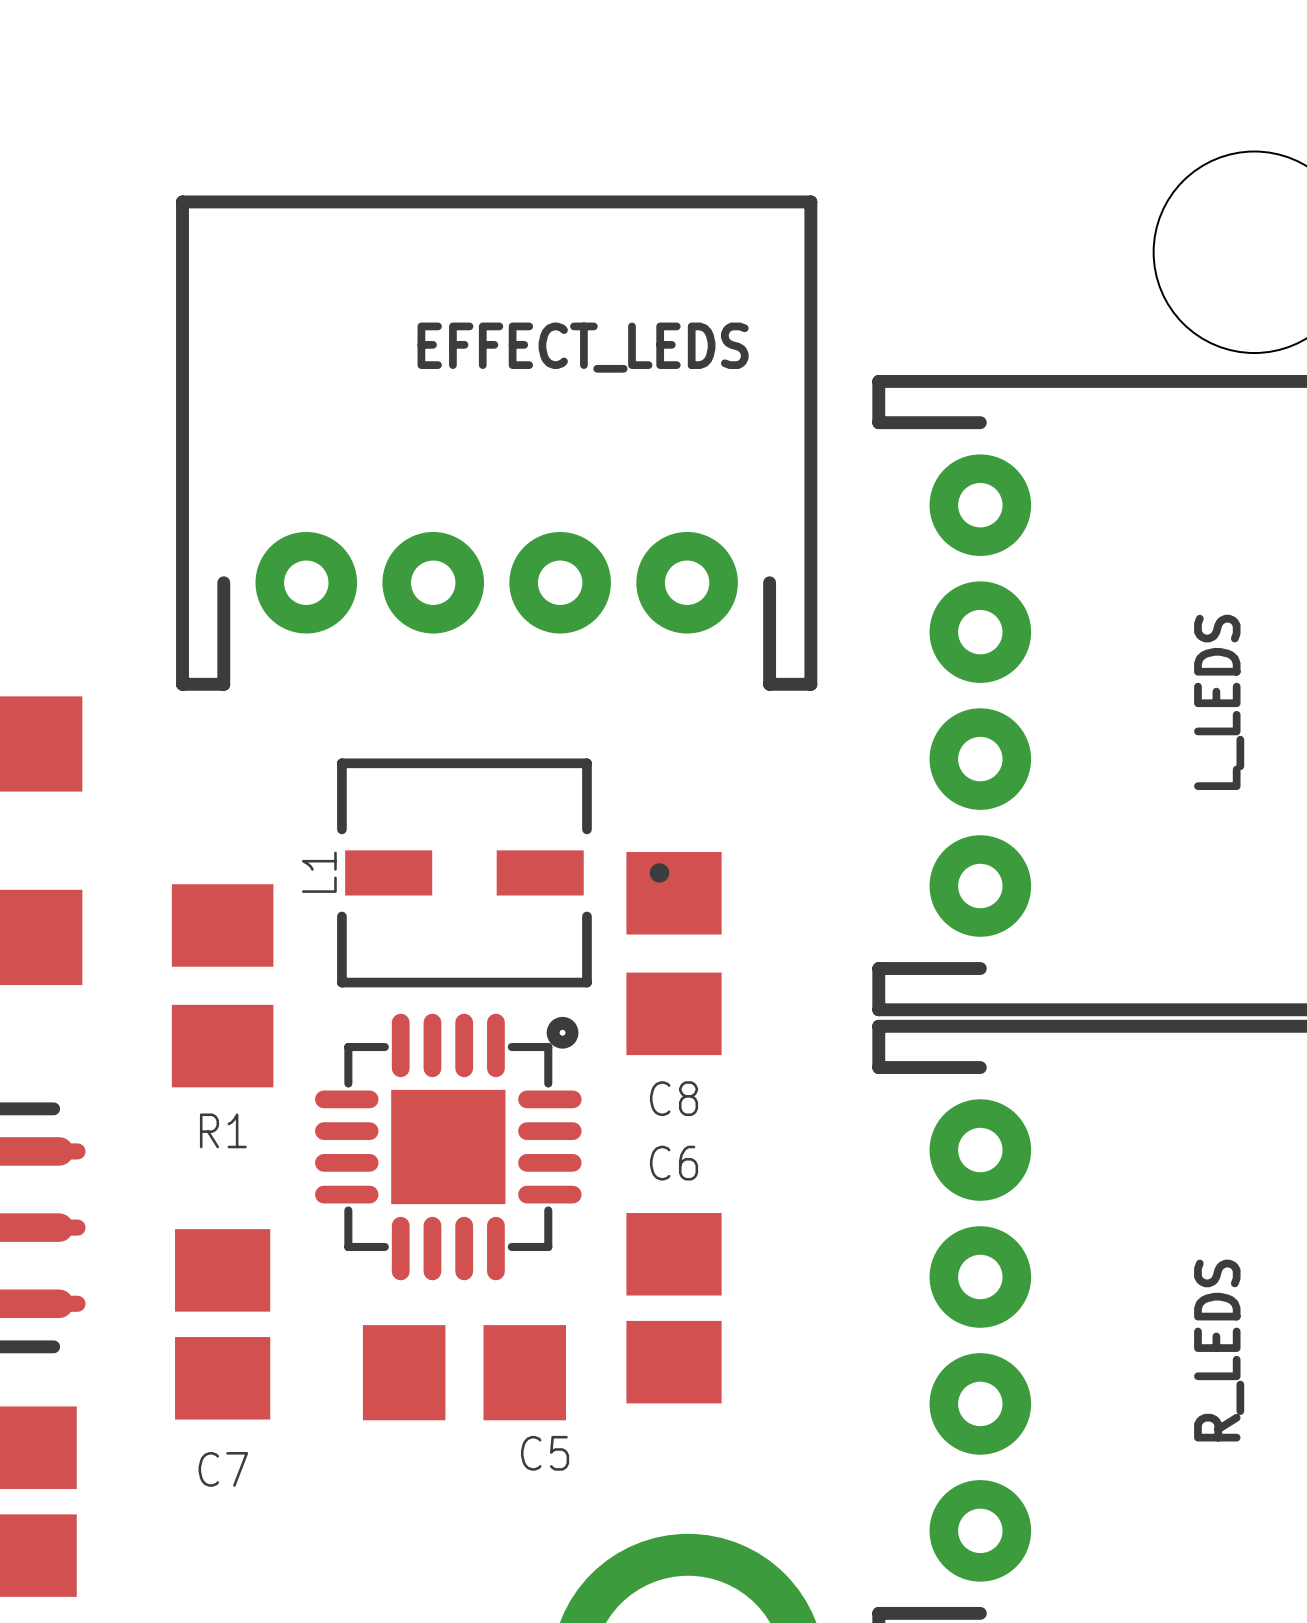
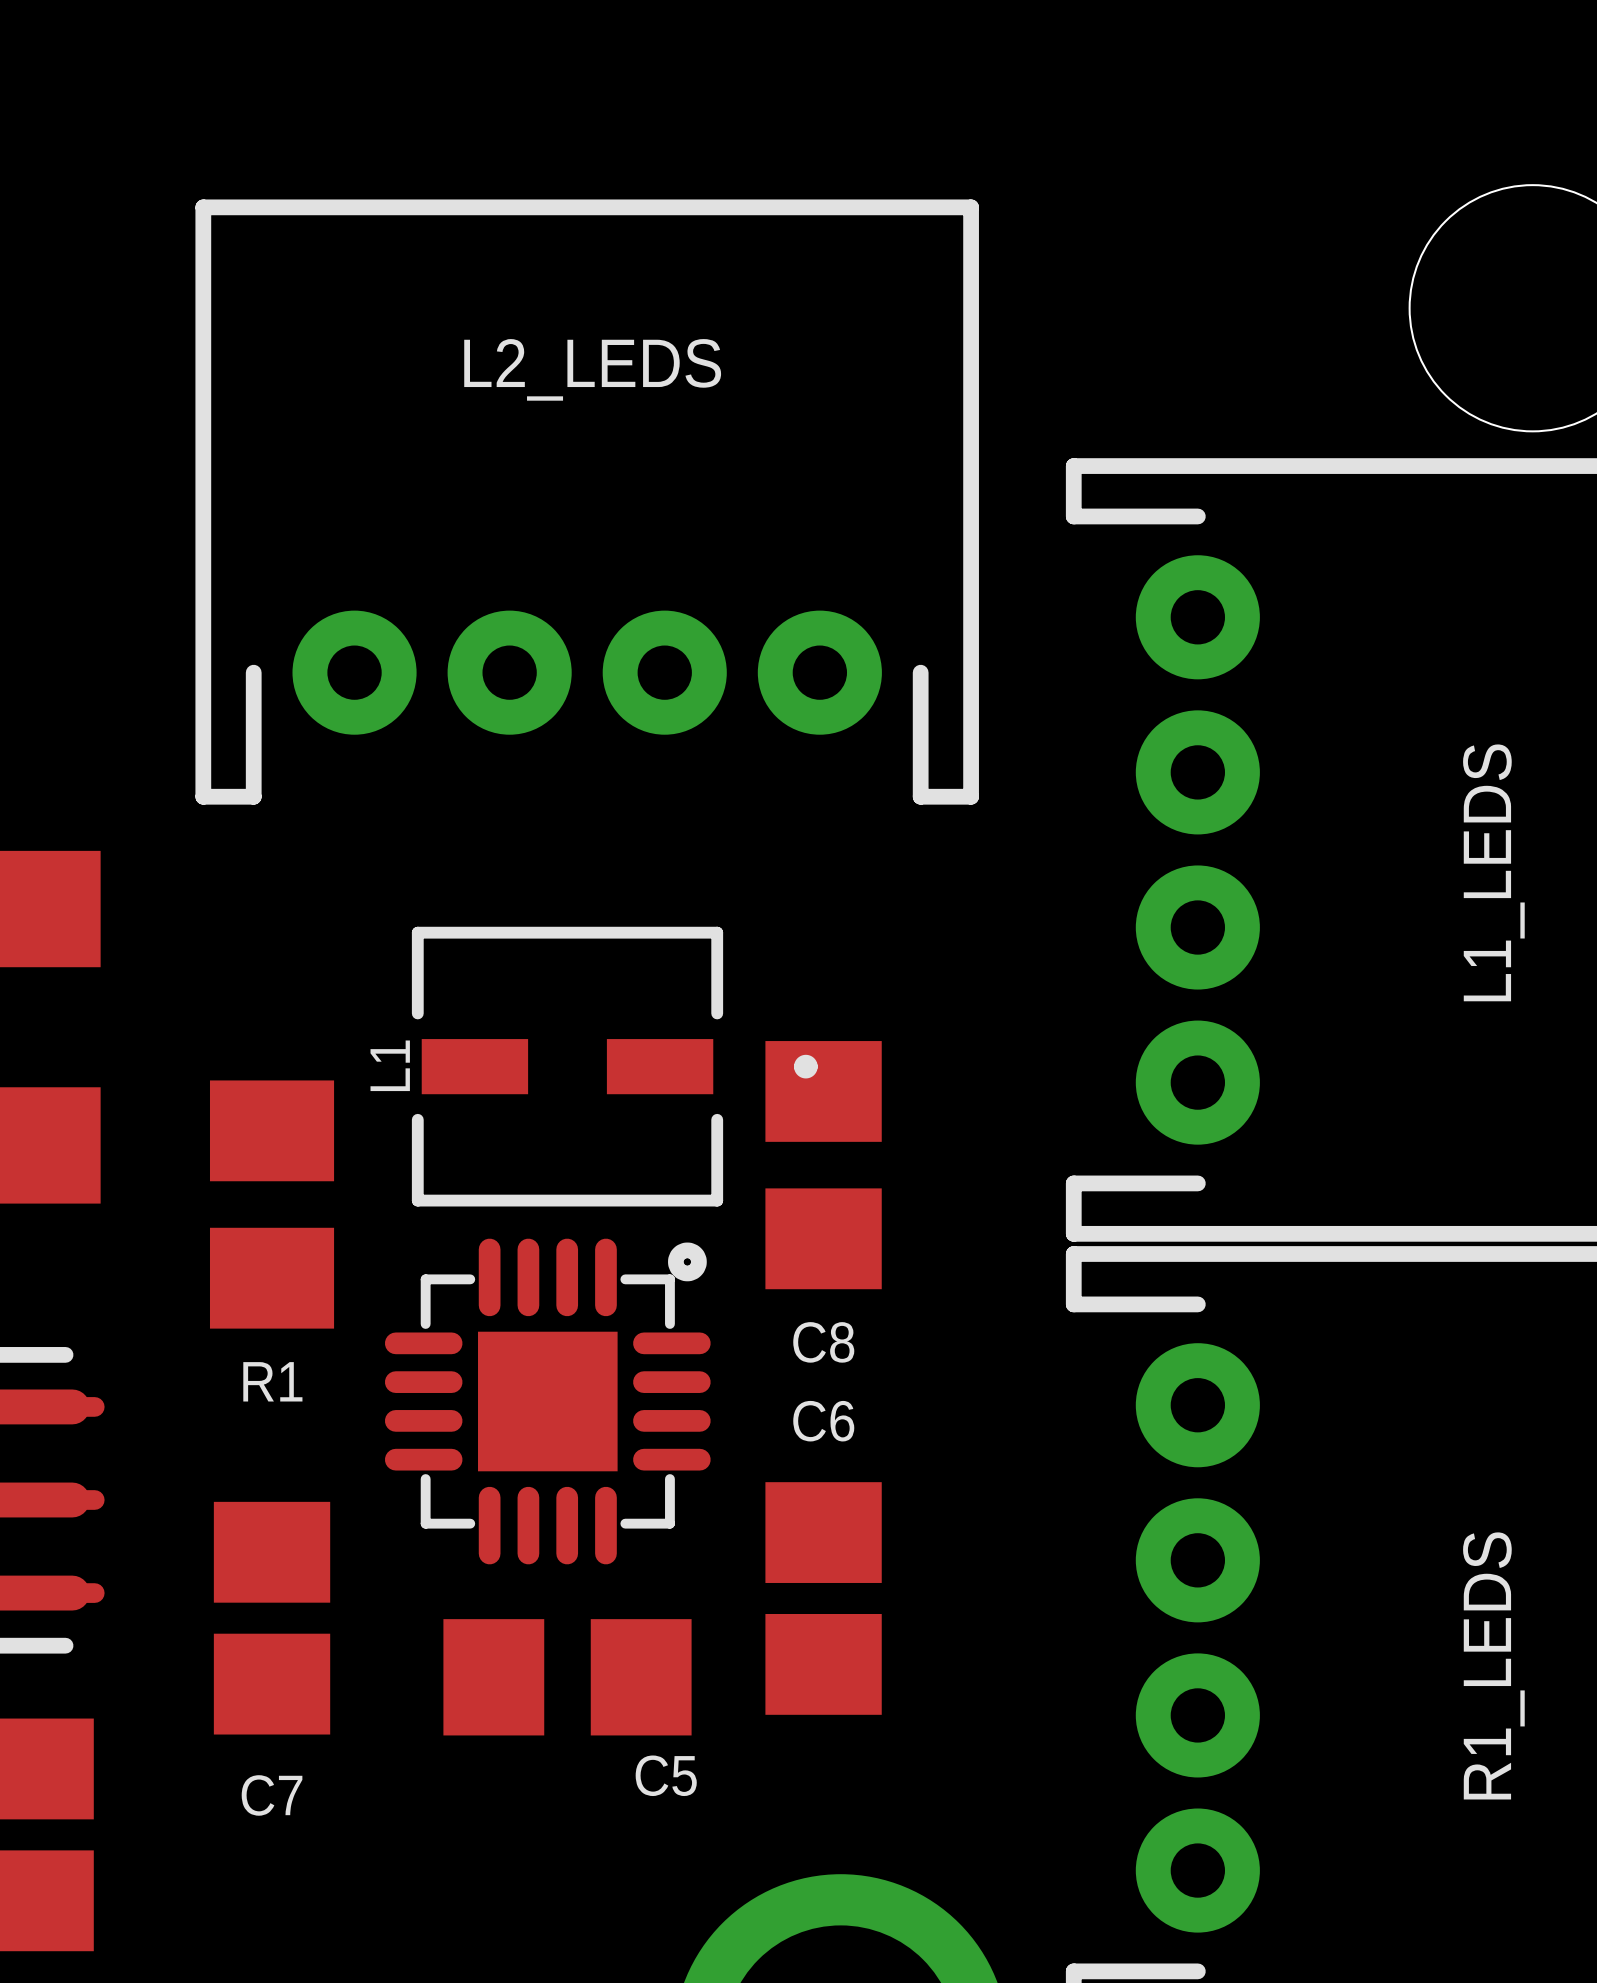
EFFECT_LEDS name: EFFECT_LEDS (583, 347) -> L2_LEDS (592, 369)
EFFECT_LEDS position: (496, 443) -> (587, 502)
L_LEDS name: L_LEDS (1219, 702) -> L1_LEDS (1493, 872)
R_LEDS name: R_LEDS (1219, 1350) -> R1_LEDS (1493, 1665)

